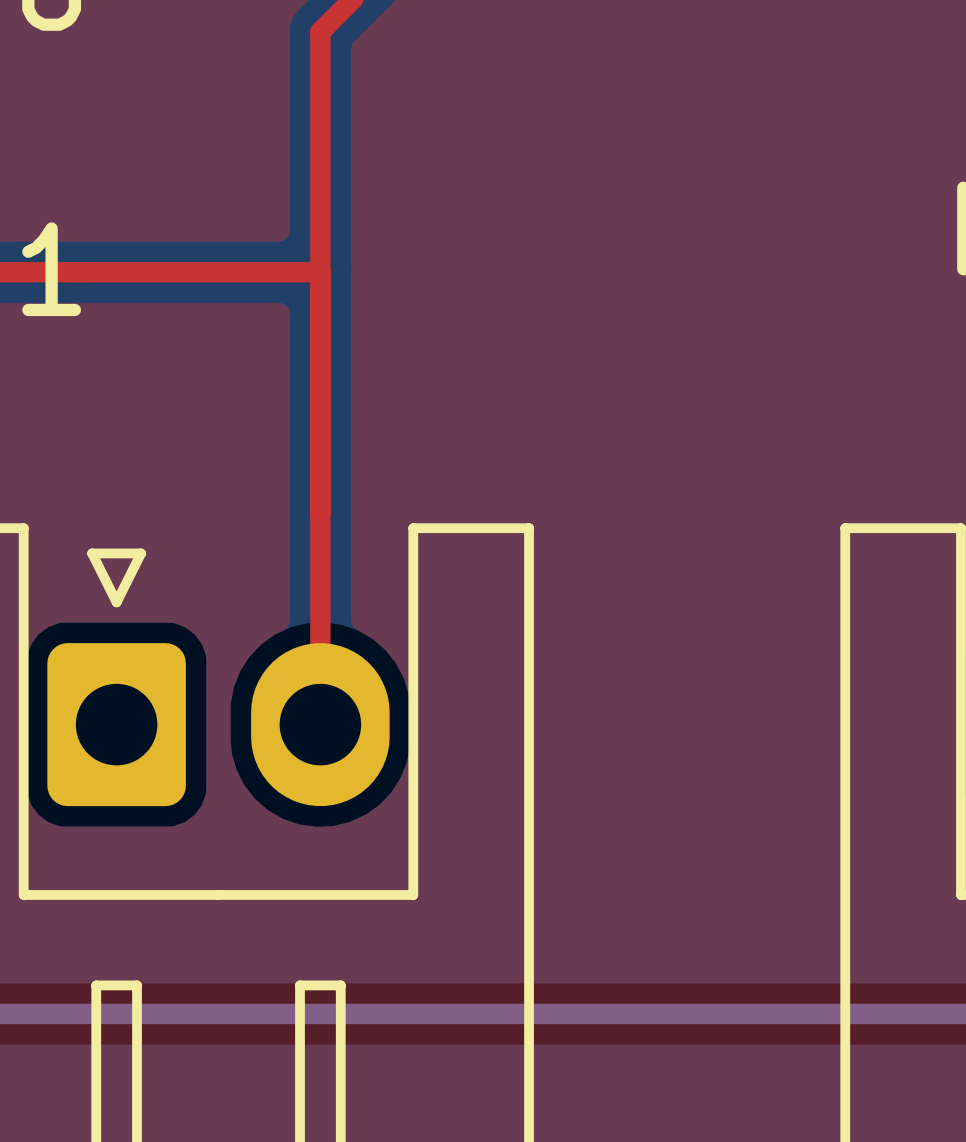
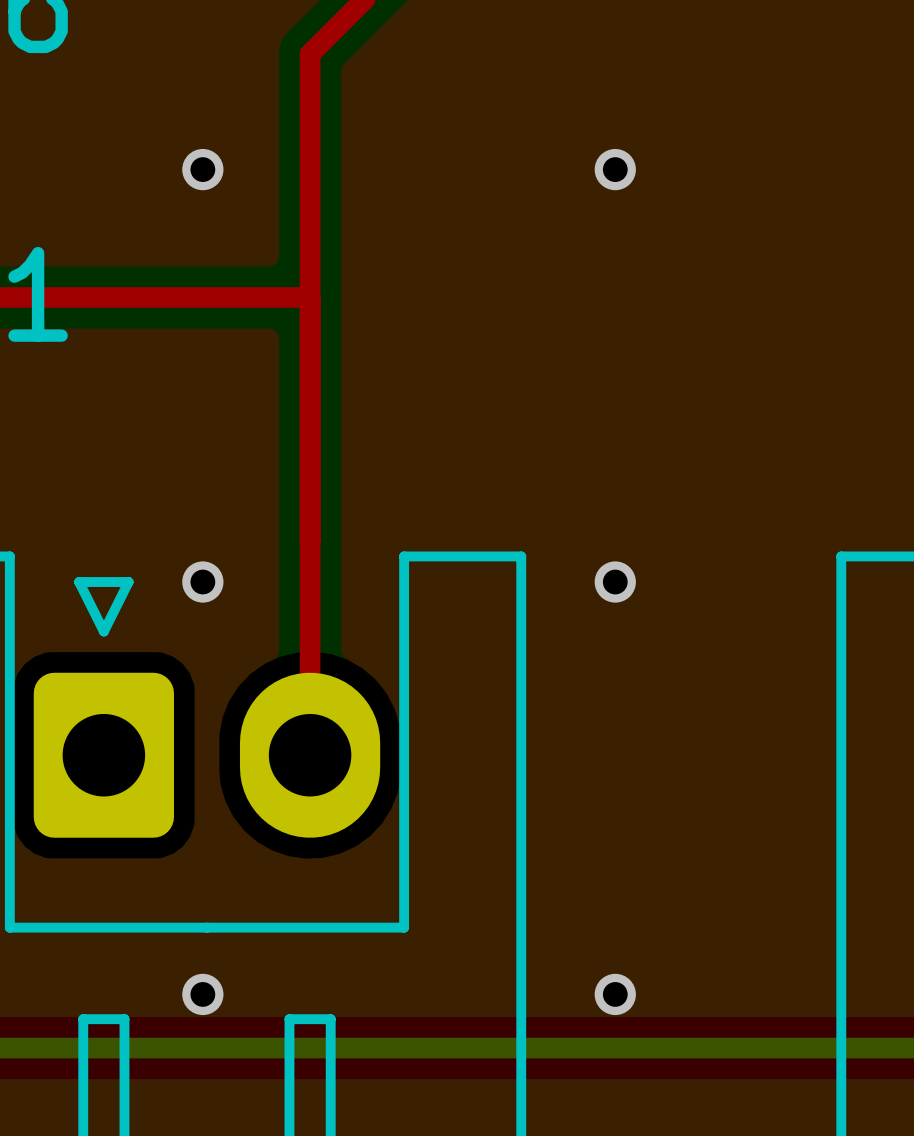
via: none -> (202, 169)
via: none -> (615, 169)
via: none -> (202, 582)
via: none -> (615, 582)
via: none -> (202, 994)
via: none -> (615, 994)

